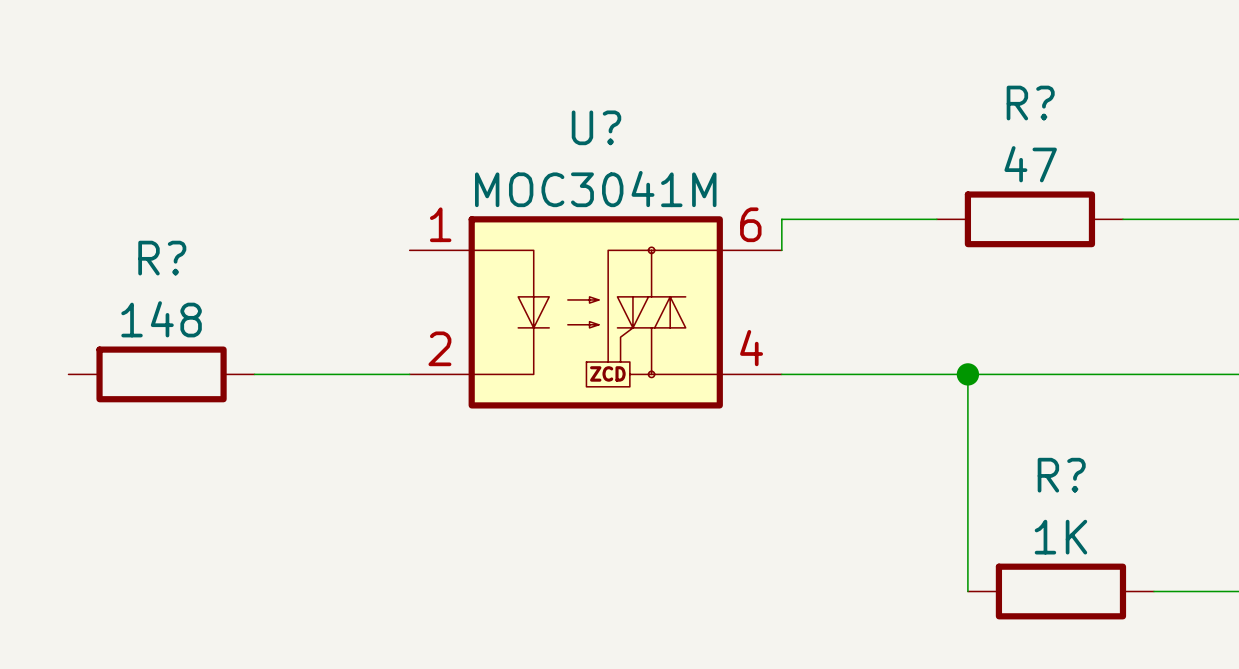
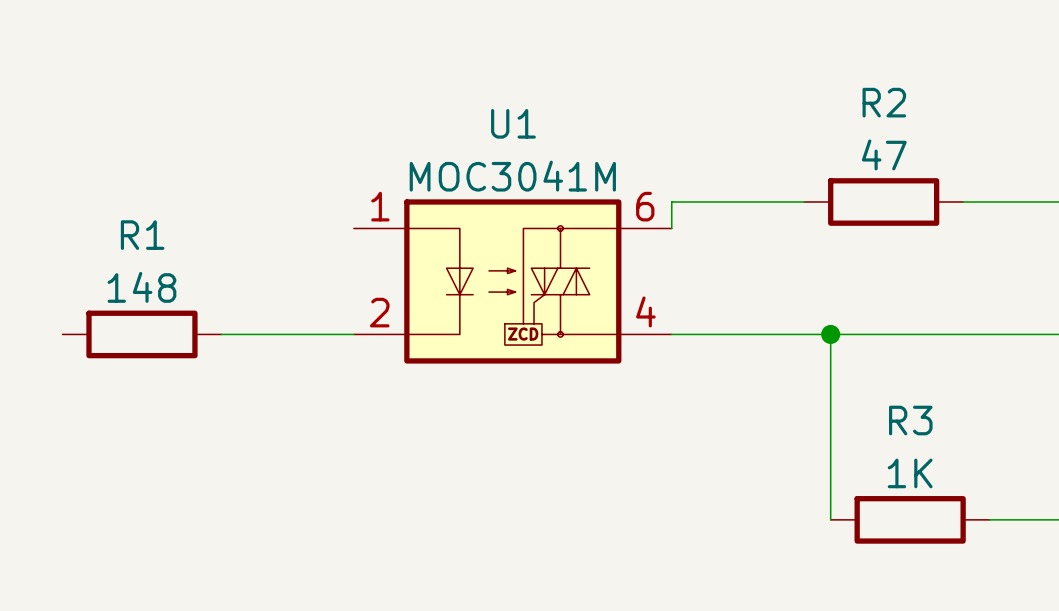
R? name: R? (1030, 103) -> R2 (884, 102)
U? name: U? (596, 127) -> U1 (513, 123)
R? name: R? (162, 258) -> R1 (142, 235)
R? name: R? (1061, 475) -> R3 (910, 420)

